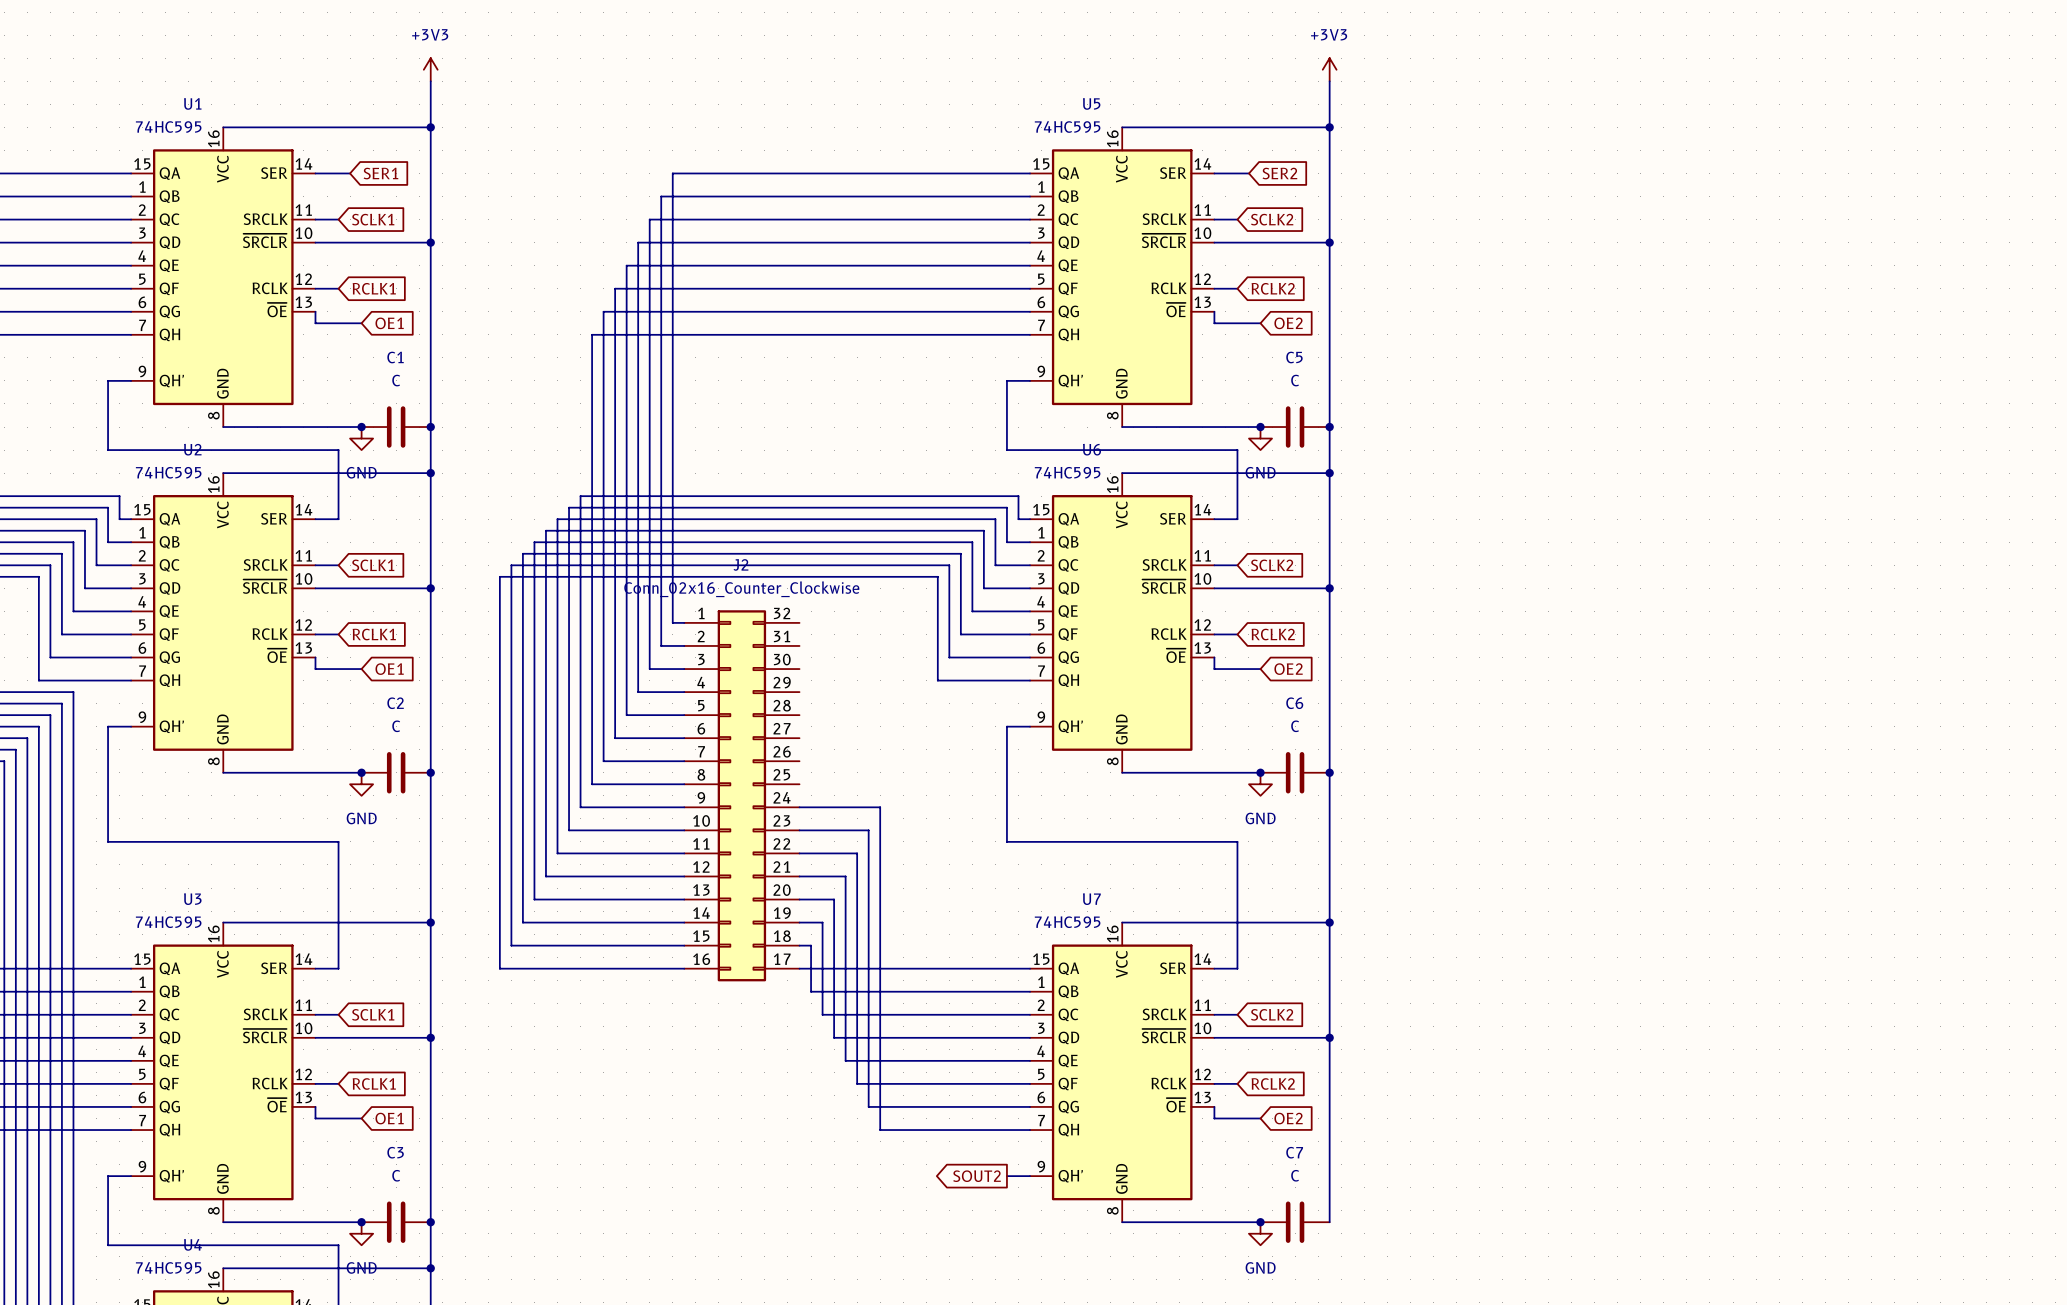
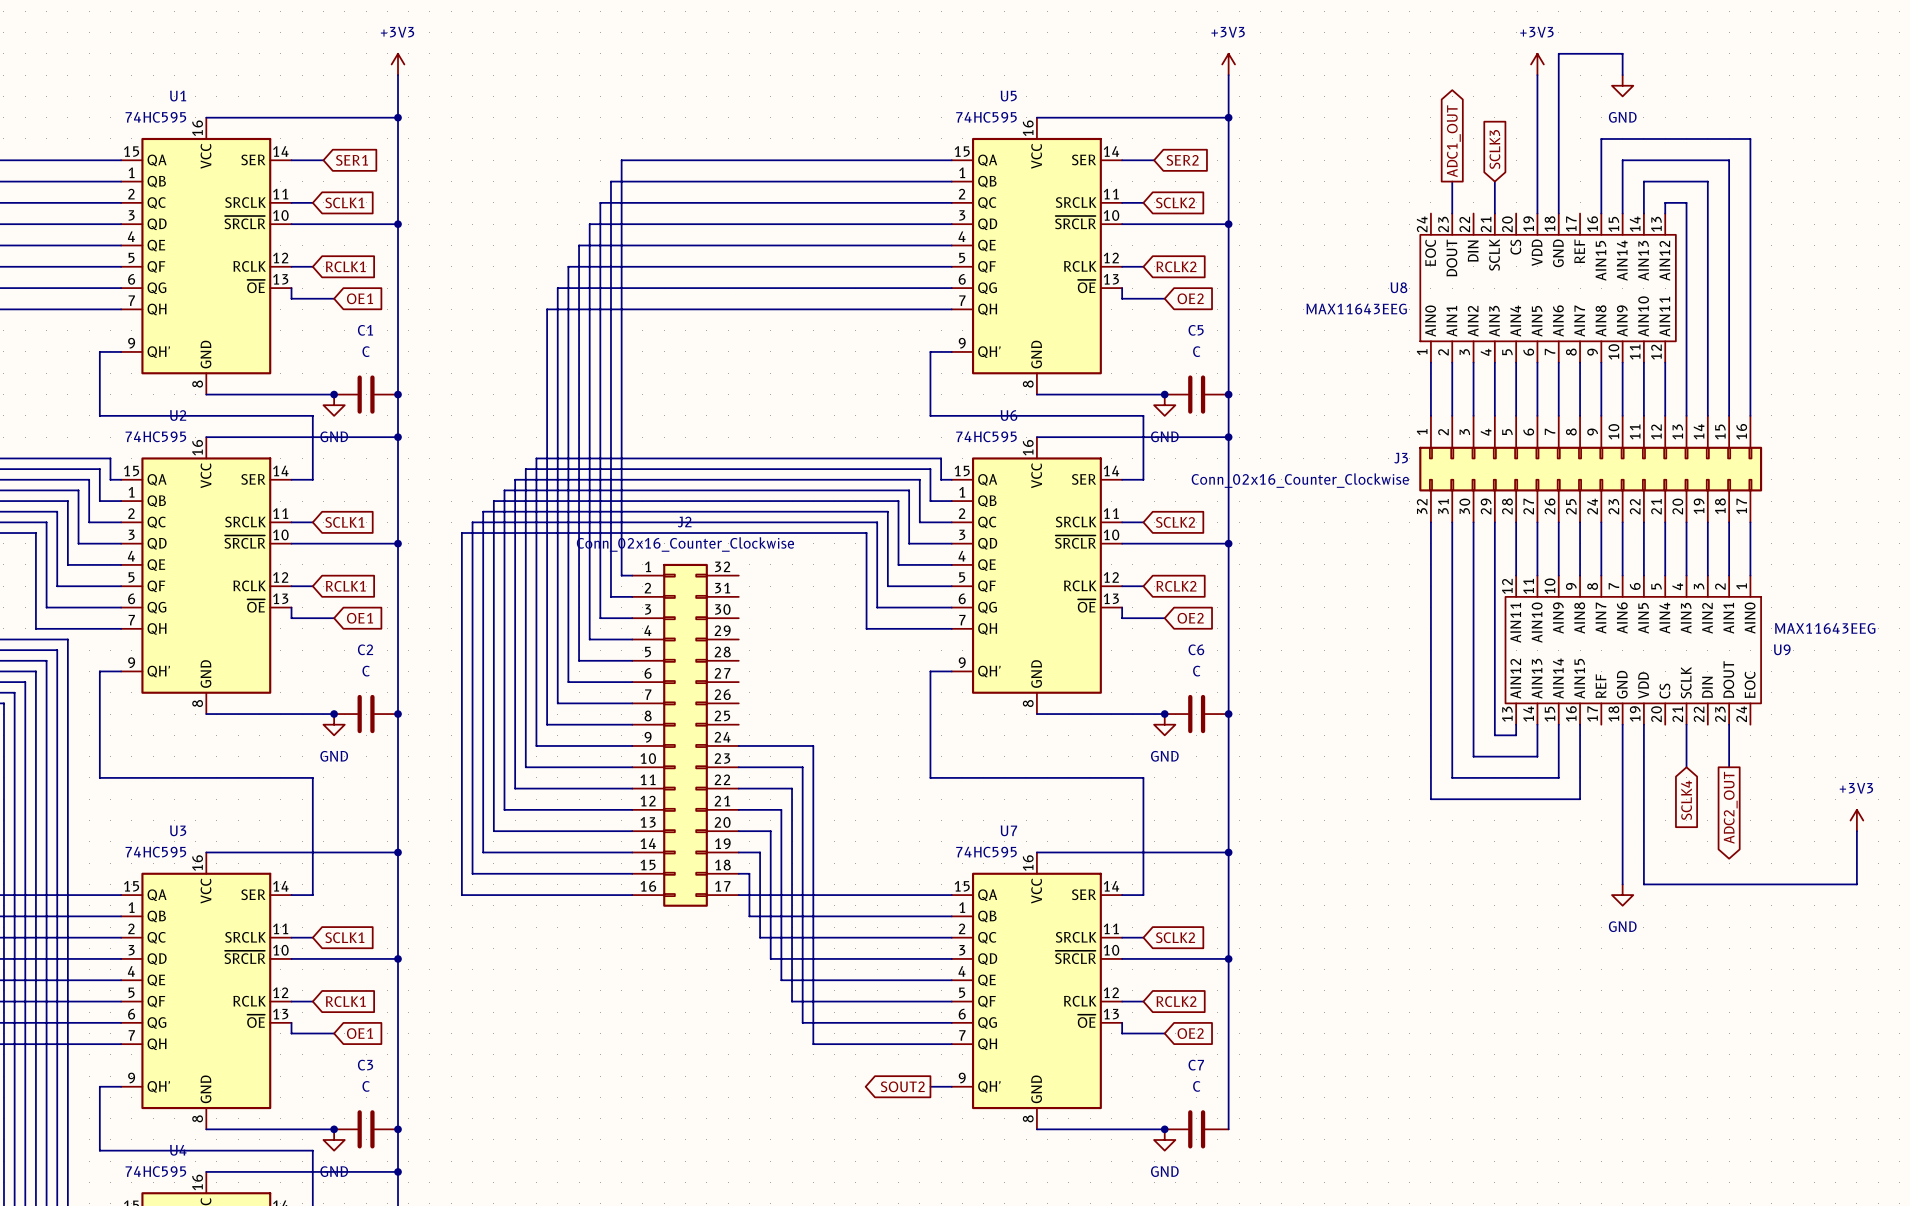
power symbol: none -> +3V3 (1537, 64)
wire: none -> (1537, 75) (1537, 213)
wire: none -> (1622, 75) (1622, 53) (1558, 53) (1558, 213)
power symbol: none -> GND (1622, 85)
global label: none -> ADC1_OUT (1453, 141)
global label: none -> SCLK3 (1494, 149)
wire: none -> (1452, 181) (1452, 213)
wire: none -> (1494, 181) (1494, 213)
wire: none -> (1601, 213) (1601, 138) (1750, 138) (1750, 415)
wire: none -> (1622, 213) (1622, 160) (1729, 160) (1729, 415)
wire: none -> (1643, 213) (1643, 181) (1707, 181) (1707, 415)
wire: none -> (1665, 213) (1665, 202) (1686, 202) (1686, 415)
U8: none -> MAX11643EEG (1532, 288)
wire: none -> (1430, 362) (1430, 415)
wire: none -> (1452, 362) (1452, 415)
wire: none -> (1473, 362) (1473, 415)
wire: none -> (1494, 362) (1494, 415)
wire: none -> (1516, 362) (1516, 415)
wire: none -> (1537, 362) (1537, 415)
wire: none -> (1558, 362) (1558, 415)
wire: none -> (1580, 362) (1580, 415)
wire: none -> (1601, 362) (1601, 415)
wire: none -> (1622, 362) (1622, 415)
wire: none -> (1643, 362) (1643, 415)
wire: none -> (1665, 362) (1665, 415)
J3: none -> Conn_02x16_Counter_Clockwise (1590, 469)
wire: none -> (1430, 522) (1430, 799) (1580, 799) (1580, 724)
wire: none -> (1452, 522) (1452, 777) (1558, 777) (1558, 724)
wire: none -> (1473, 522) (1473, 756) (1537, 756) (1537, 724)
wire: none -> (1494, 522) (1494, 735) (1516, 735) (1516, 724)
wire: none -> (1516, 522) (1516, 575)
wire: none -> (1537, 522) (1537, 575)
wire: none -> (1558, 522) (1558, 575)
wire: none -> (1580, 522) (1580, 575)
wire: none -> (1601, 522) (1601, 575)
wire: none -> (1622, 522) (1622, 575)
wire: none -> (1643, 522) (1643, 575)
wire: none -> (1665, 522) (1665, 575)
wire: none -> (1686, 522) (1686, 575)
wire: none -> (1707, 522) (1707, 575)
wire: none -> (1729, 522) (1729, 575)
wire: none -> (1750, 522) (1750, 575)
U9: none -> MAX11643EEG (1649, 650)
wire: none -> (1622, 724) (1622, 884)
wire: none -> (1643, 724) (1643, 884) (1856, 884) (1856, 831)
wire: none -> (1686, 724) (1686, 767)
wire: none -> (1729, 724) (1729, 767)
global label: none -> SCLK4 (1686, 800)
global label: none -> ADC2_OUT (1730, 807)
power symbol: none -> +3V3 (1856, 820)
power symbol: none -> GND (1622, 895)

